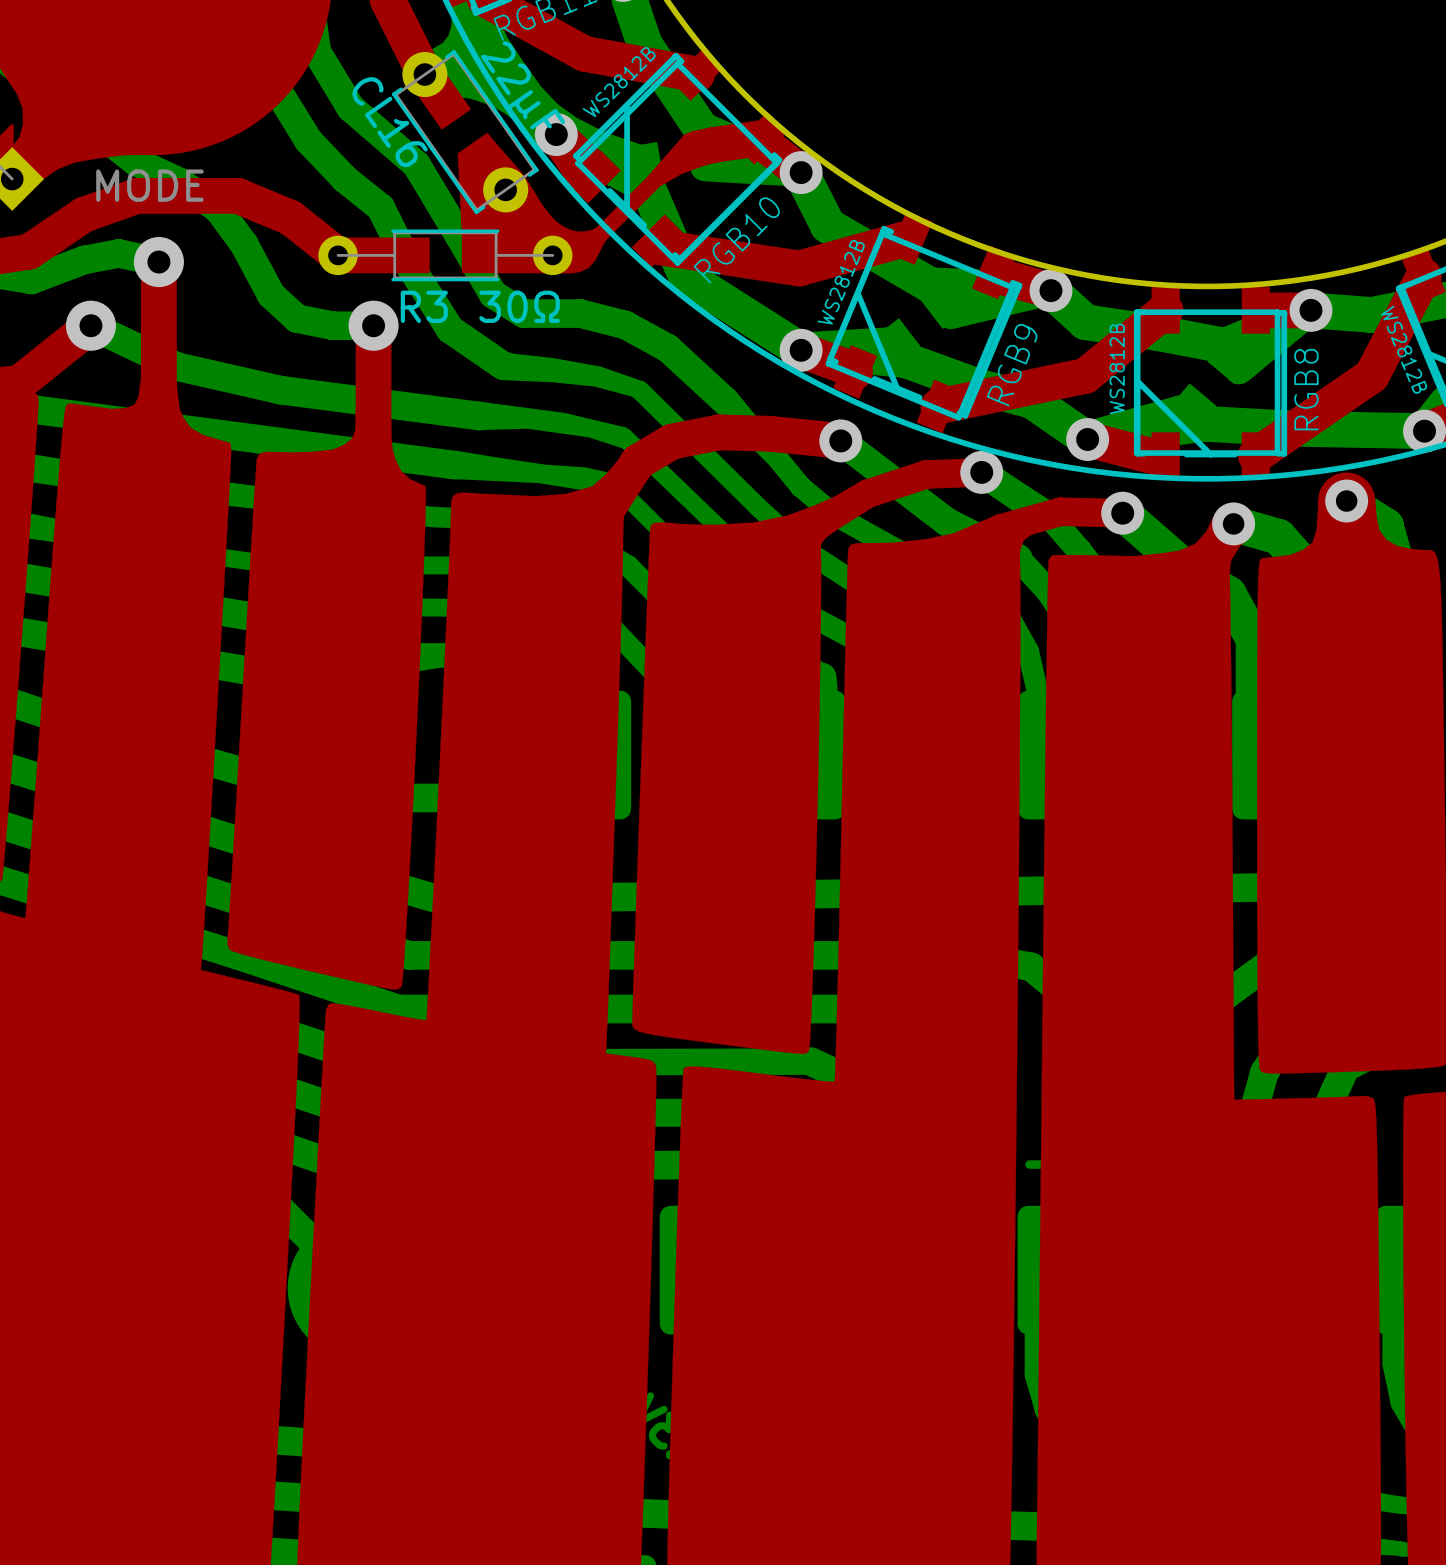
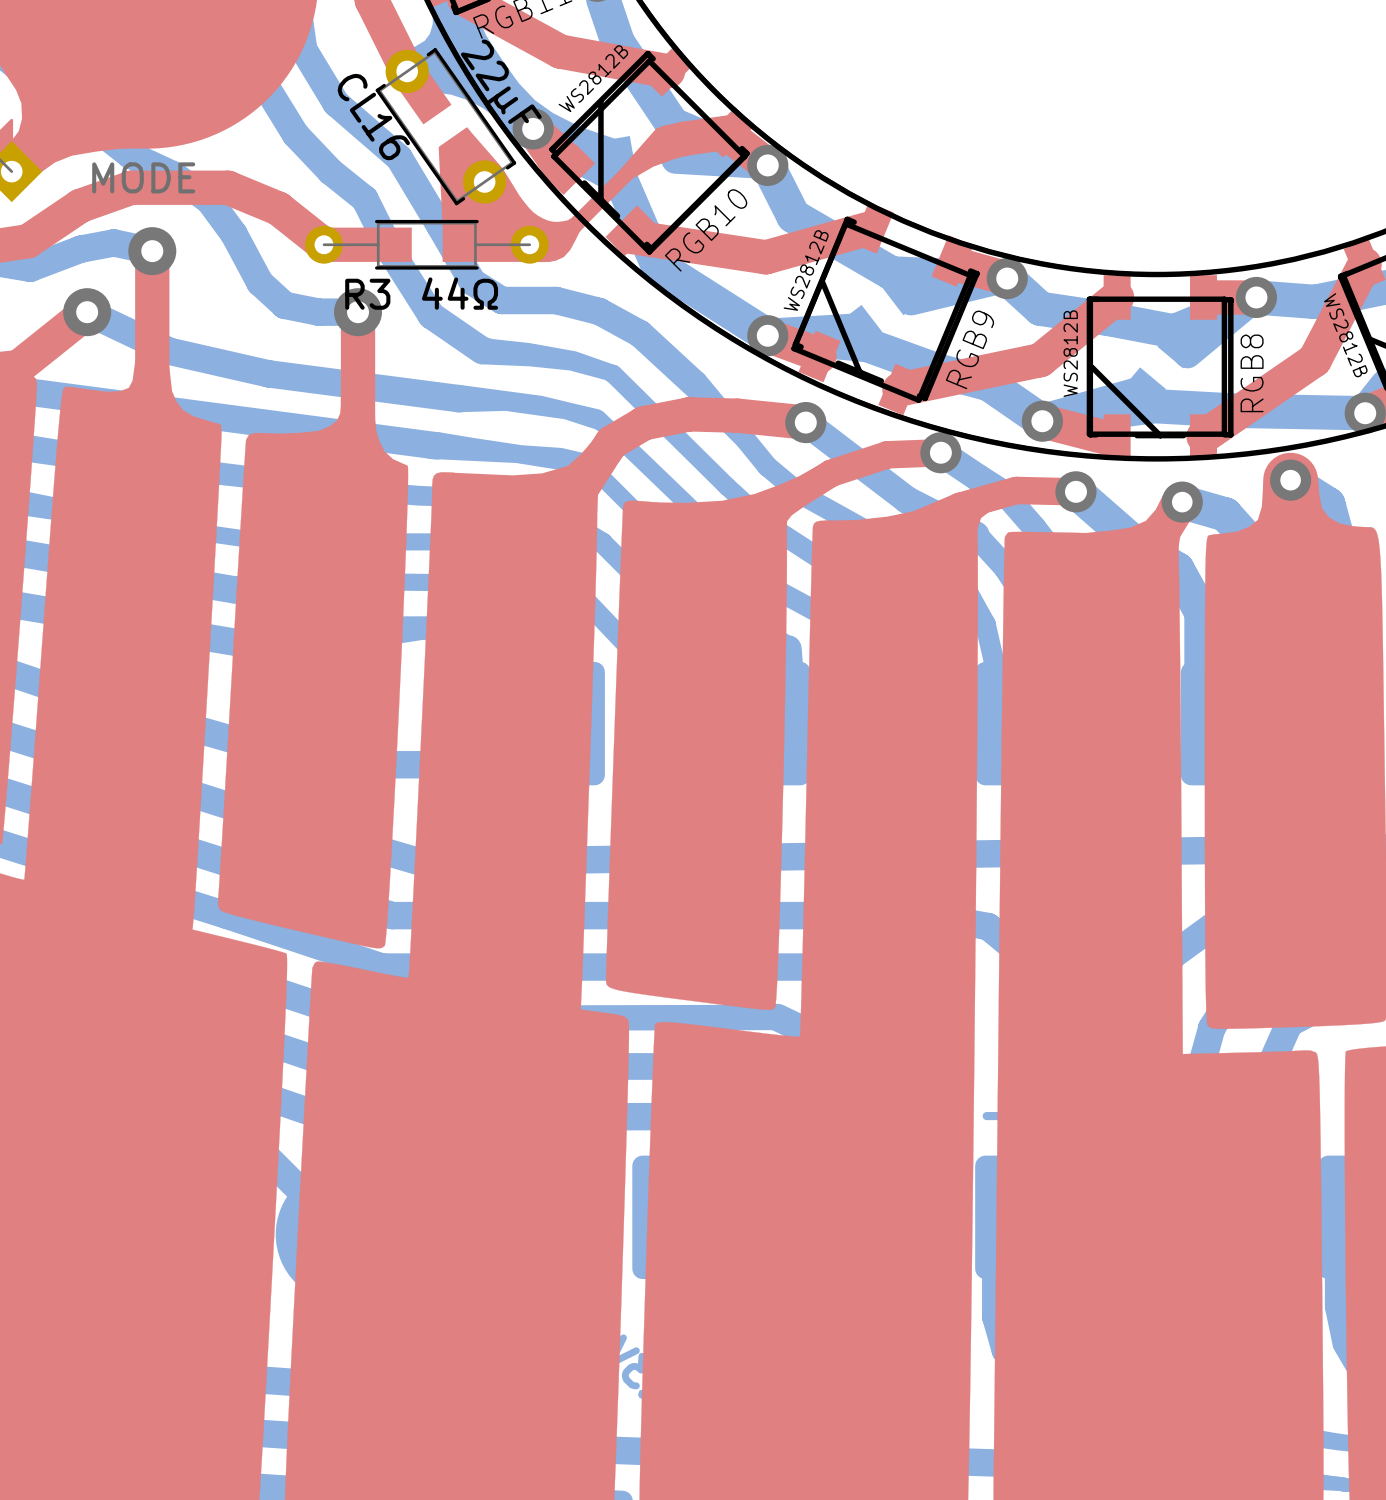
R3 name position: R3 (424, 306) -> R3 (367, 294)
R3 value: 30Ω (519, 306) -> 44Ω (460, 293)

